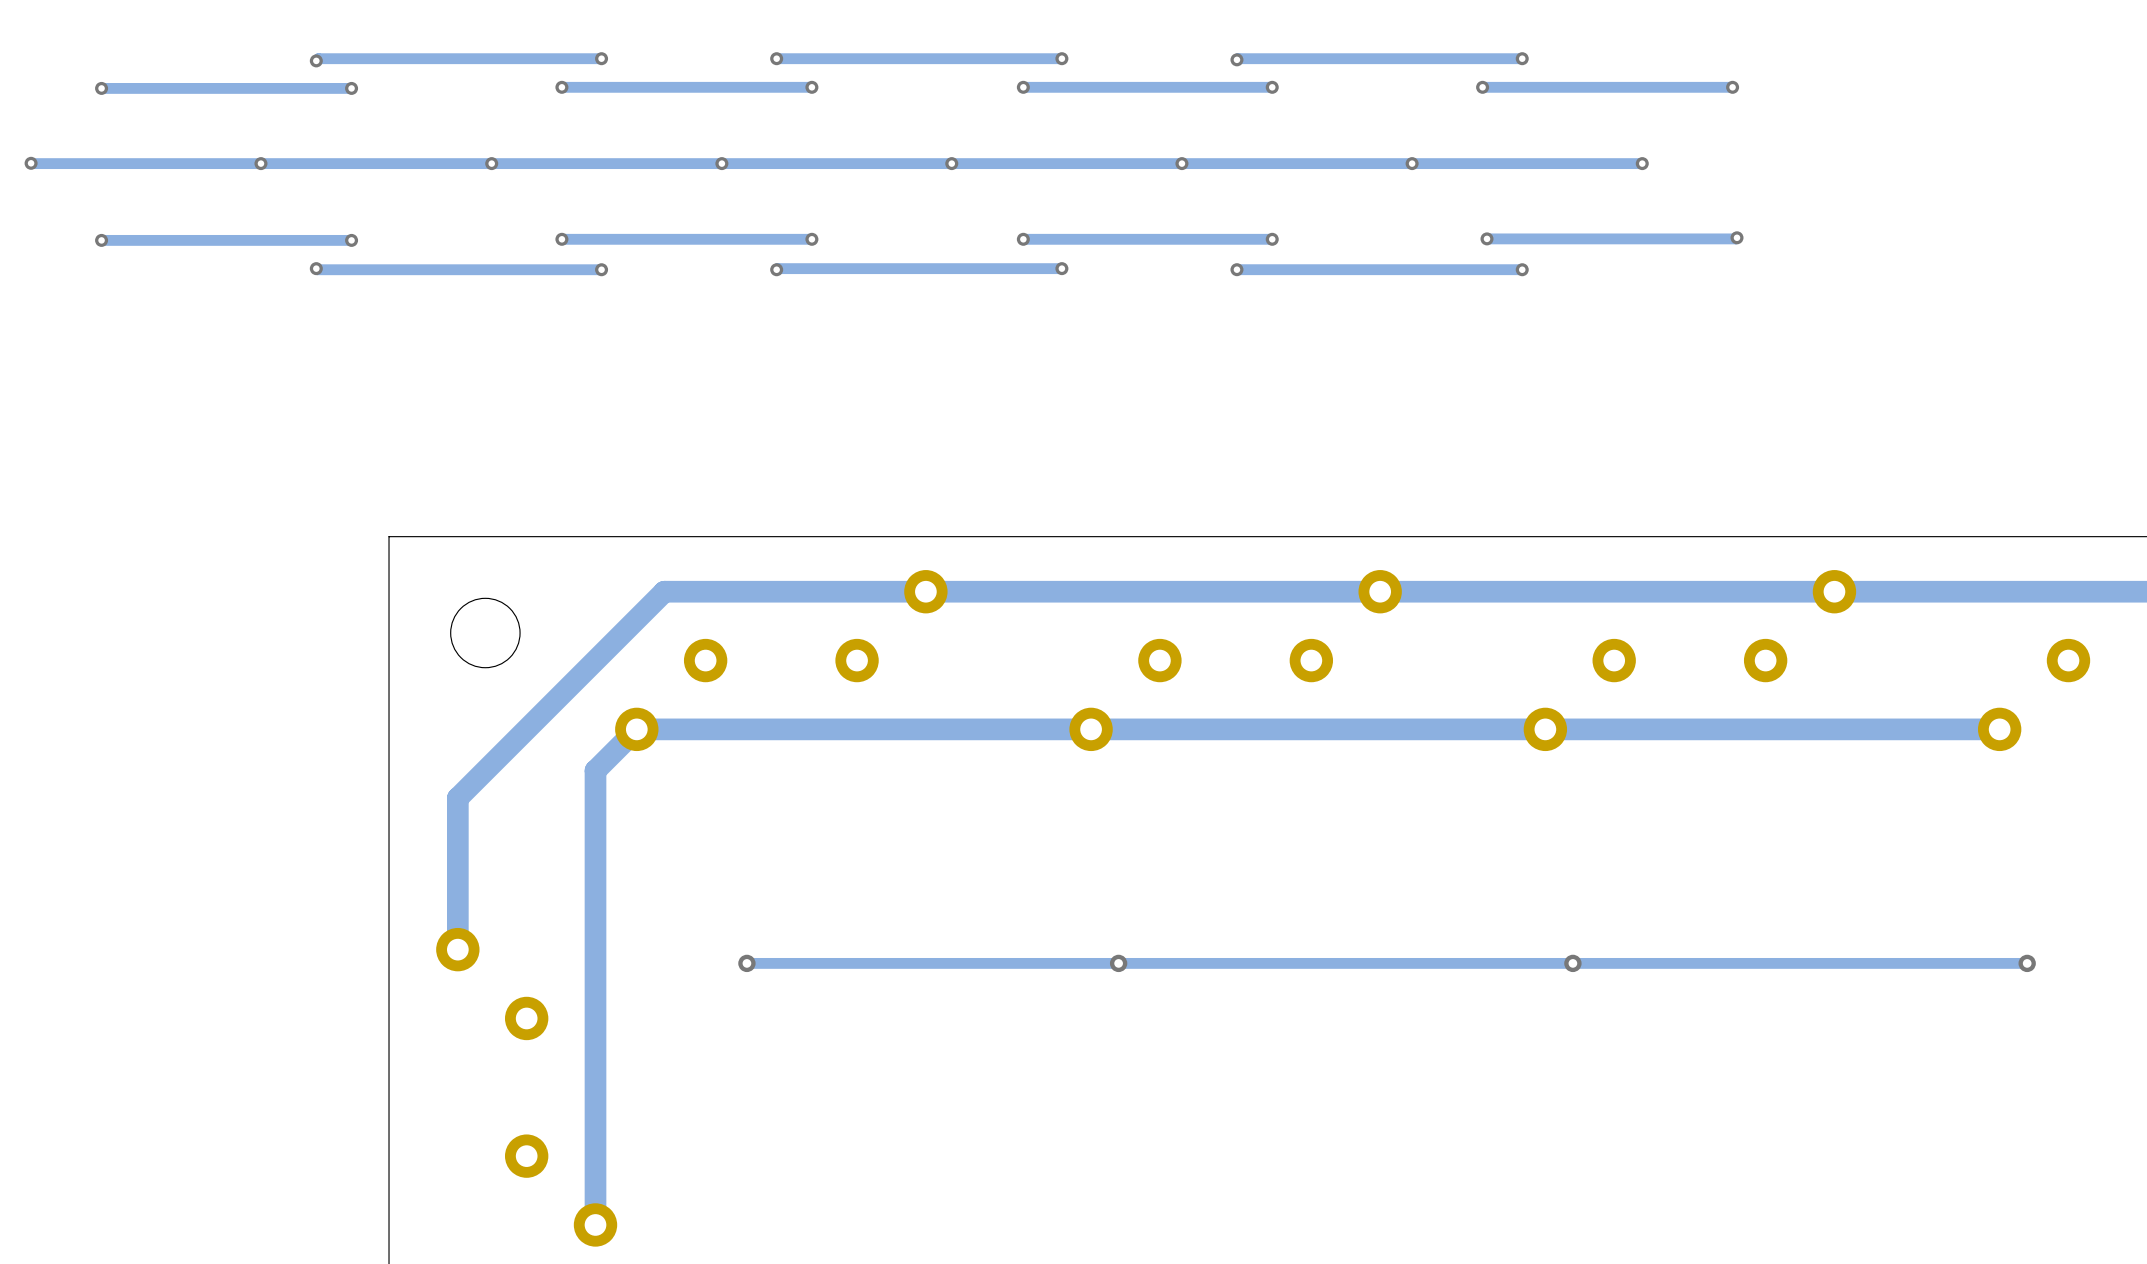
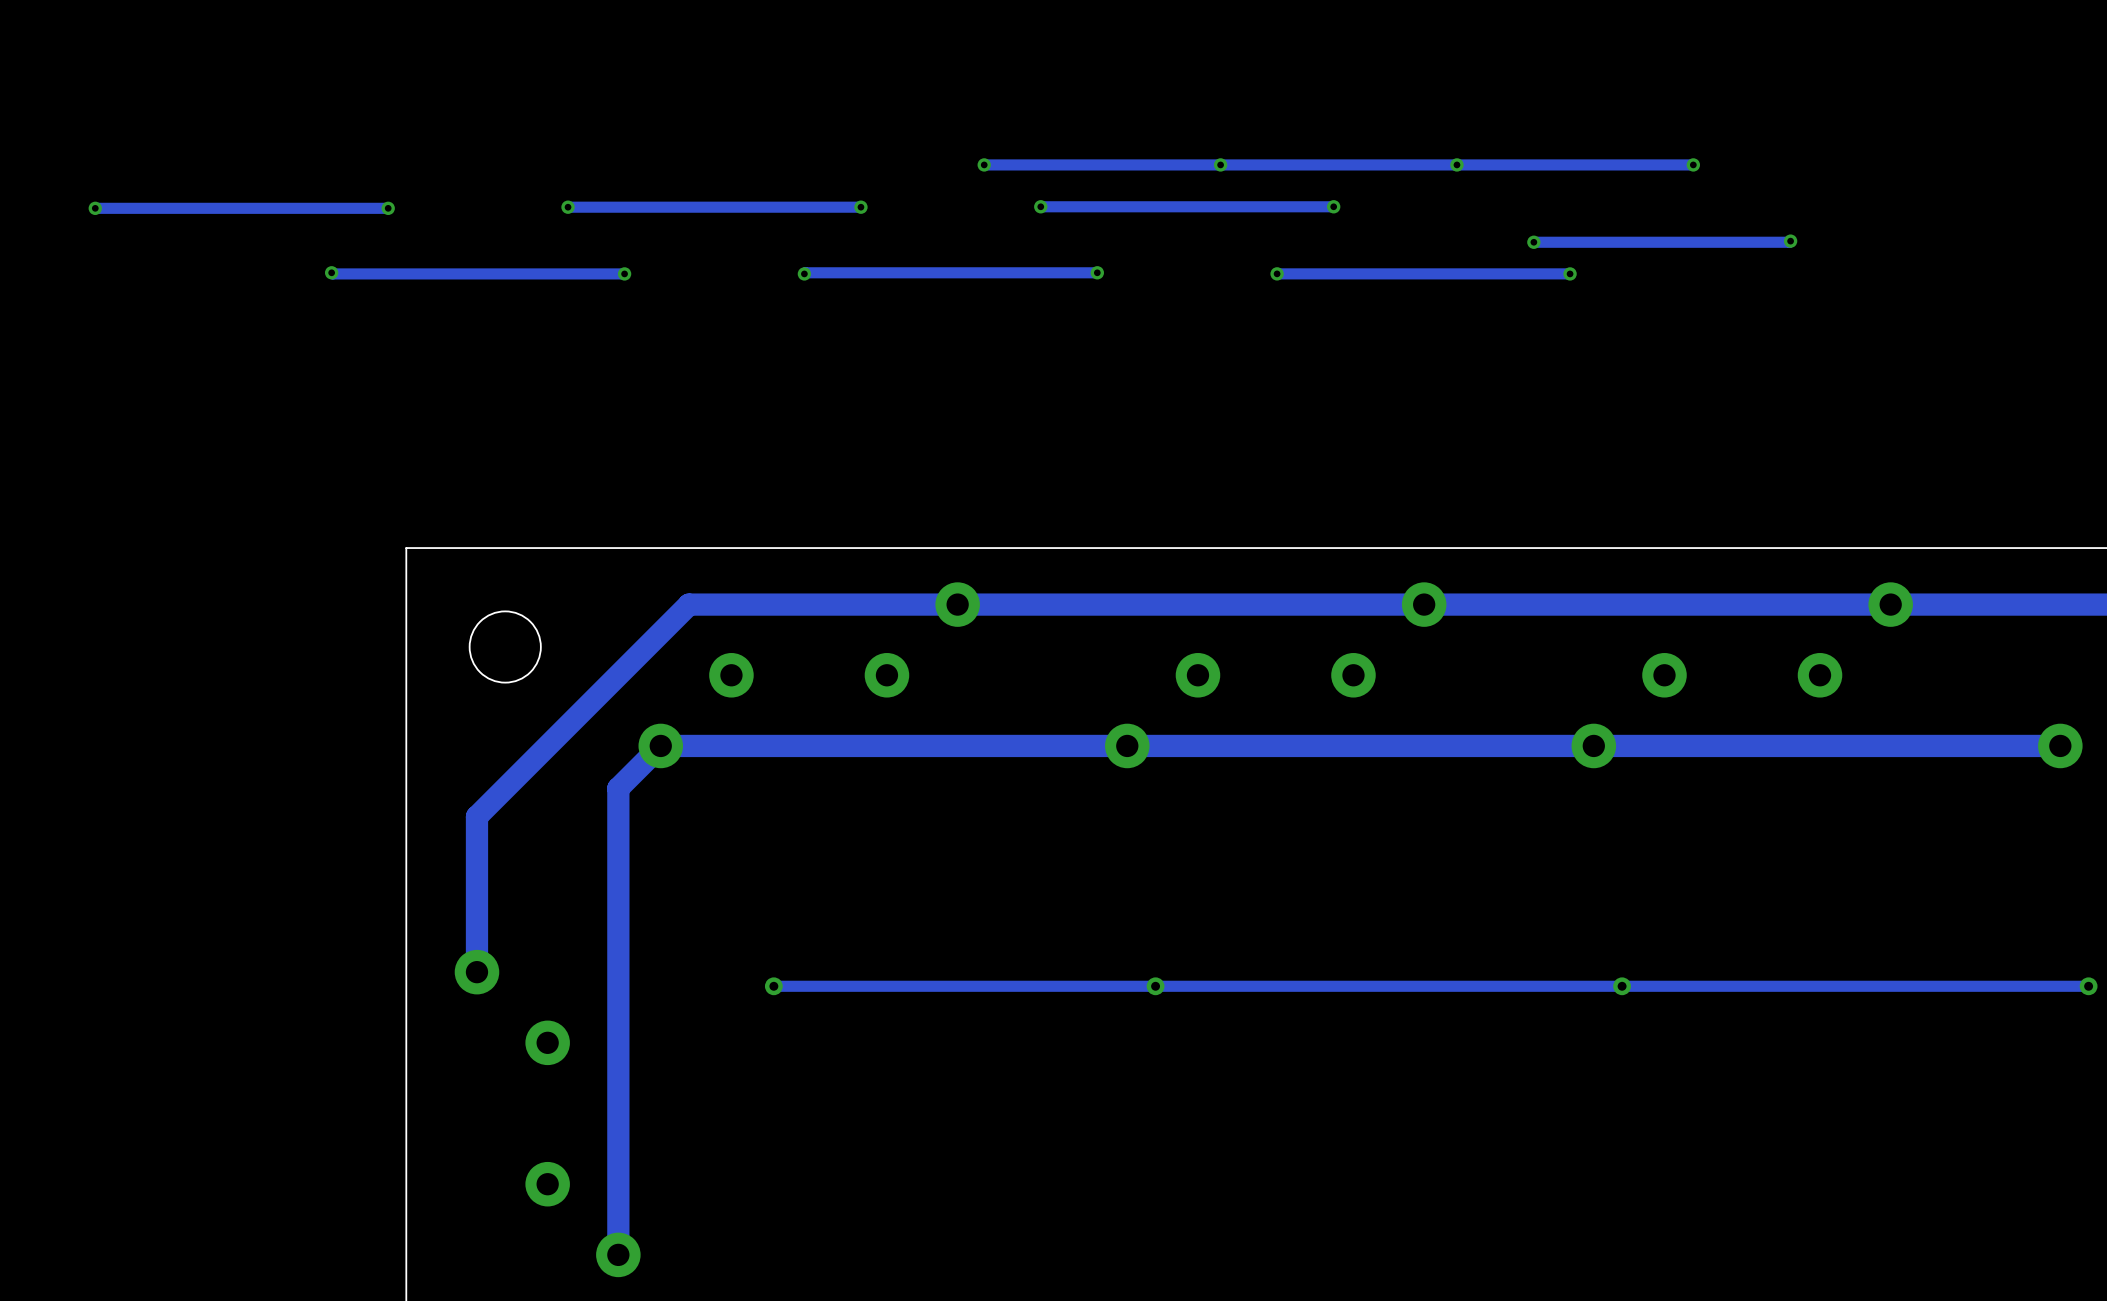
track: (601, 58) (318, 58) (316, 60) -> none
via: (601, 58) -> none
via: (776, 58) -> none
track: (1061, 58) (776, 58) -> (1333, 206) (1040, 206)
via: (1061, 58) -> none
track: (1522, 58) (1236, 59) -> none
via: (1522, 58) -> none
via: (1236, 59) -> none
via: (316, 60) -> none
via: (561, 87) -> none
track: (811, 87) (561, 87) -> none
via: (811, 87) -> none
via: (1023, 87) -> none
track: (1272, 87) (1023, 87) -> none
via: (1272, 87) -> none
via: (1482, 87) -> none
track: (1732, 87) (1482, 87) -> none
via: (1732, 87) -> none
via: (101, 88) -> none
track: (351, 88) (101, 88) -> none
via: (351, 88) -> none
via: (31, 163) -> none
via: (260, 163) -> none
via: (491, 163) -> none
via: (721, 163) -> none
track: (951, 163) (31, 163) -> none
via: none -> (568, 207)
track: none -> (860, 207) (568, 207)
via: none -> (95, 208)
track: none -> (388, 208) (95, 208)
via: (561, 239) -> none
track: (811, 239) (561, 239) -> none
via position: (811, 239) -> (860, 207)
via position: (1023, 239) -> (1040, 206)
track: (1272, 239) (1023, 239) -> none
via position: (1272, 239) -> (1333, 206)
via: (101, 240) -> none
track: (351, 240) (101, 240) -> none
via position: (351, 240) -> (388, 208)

